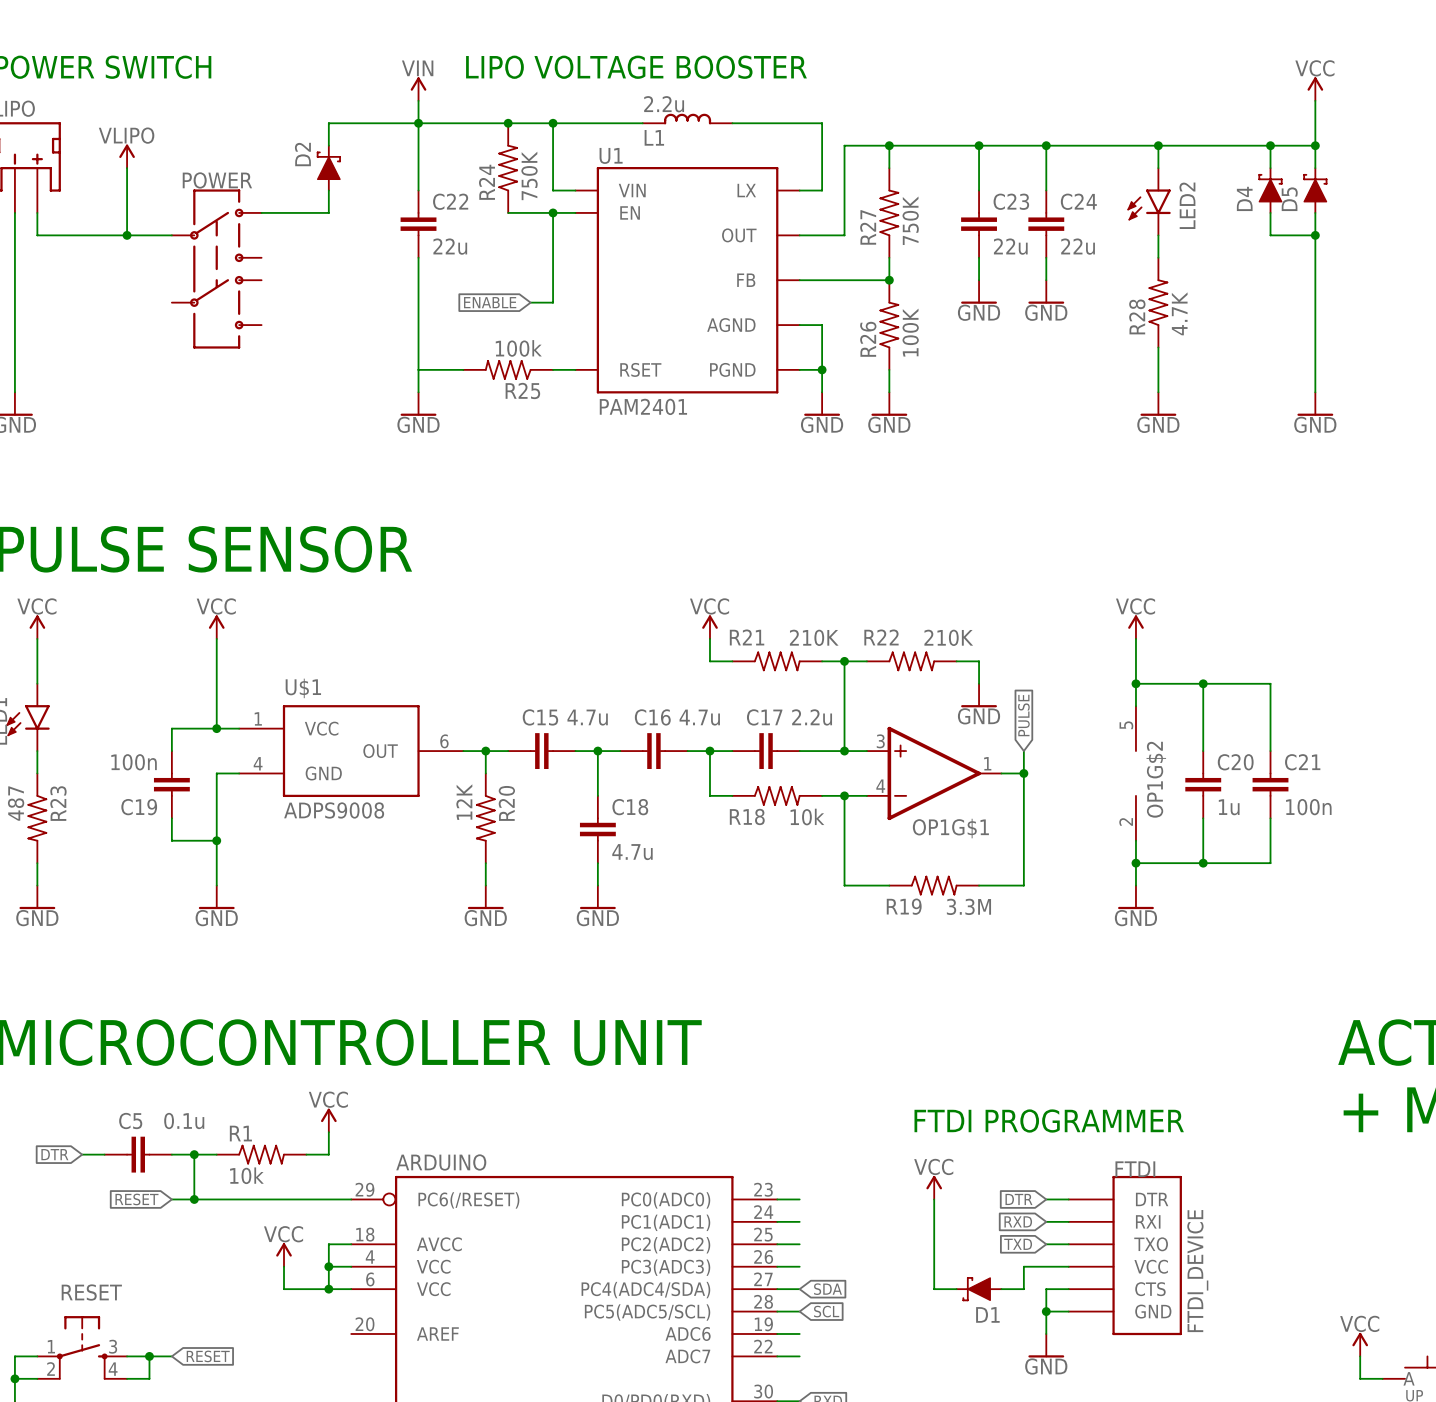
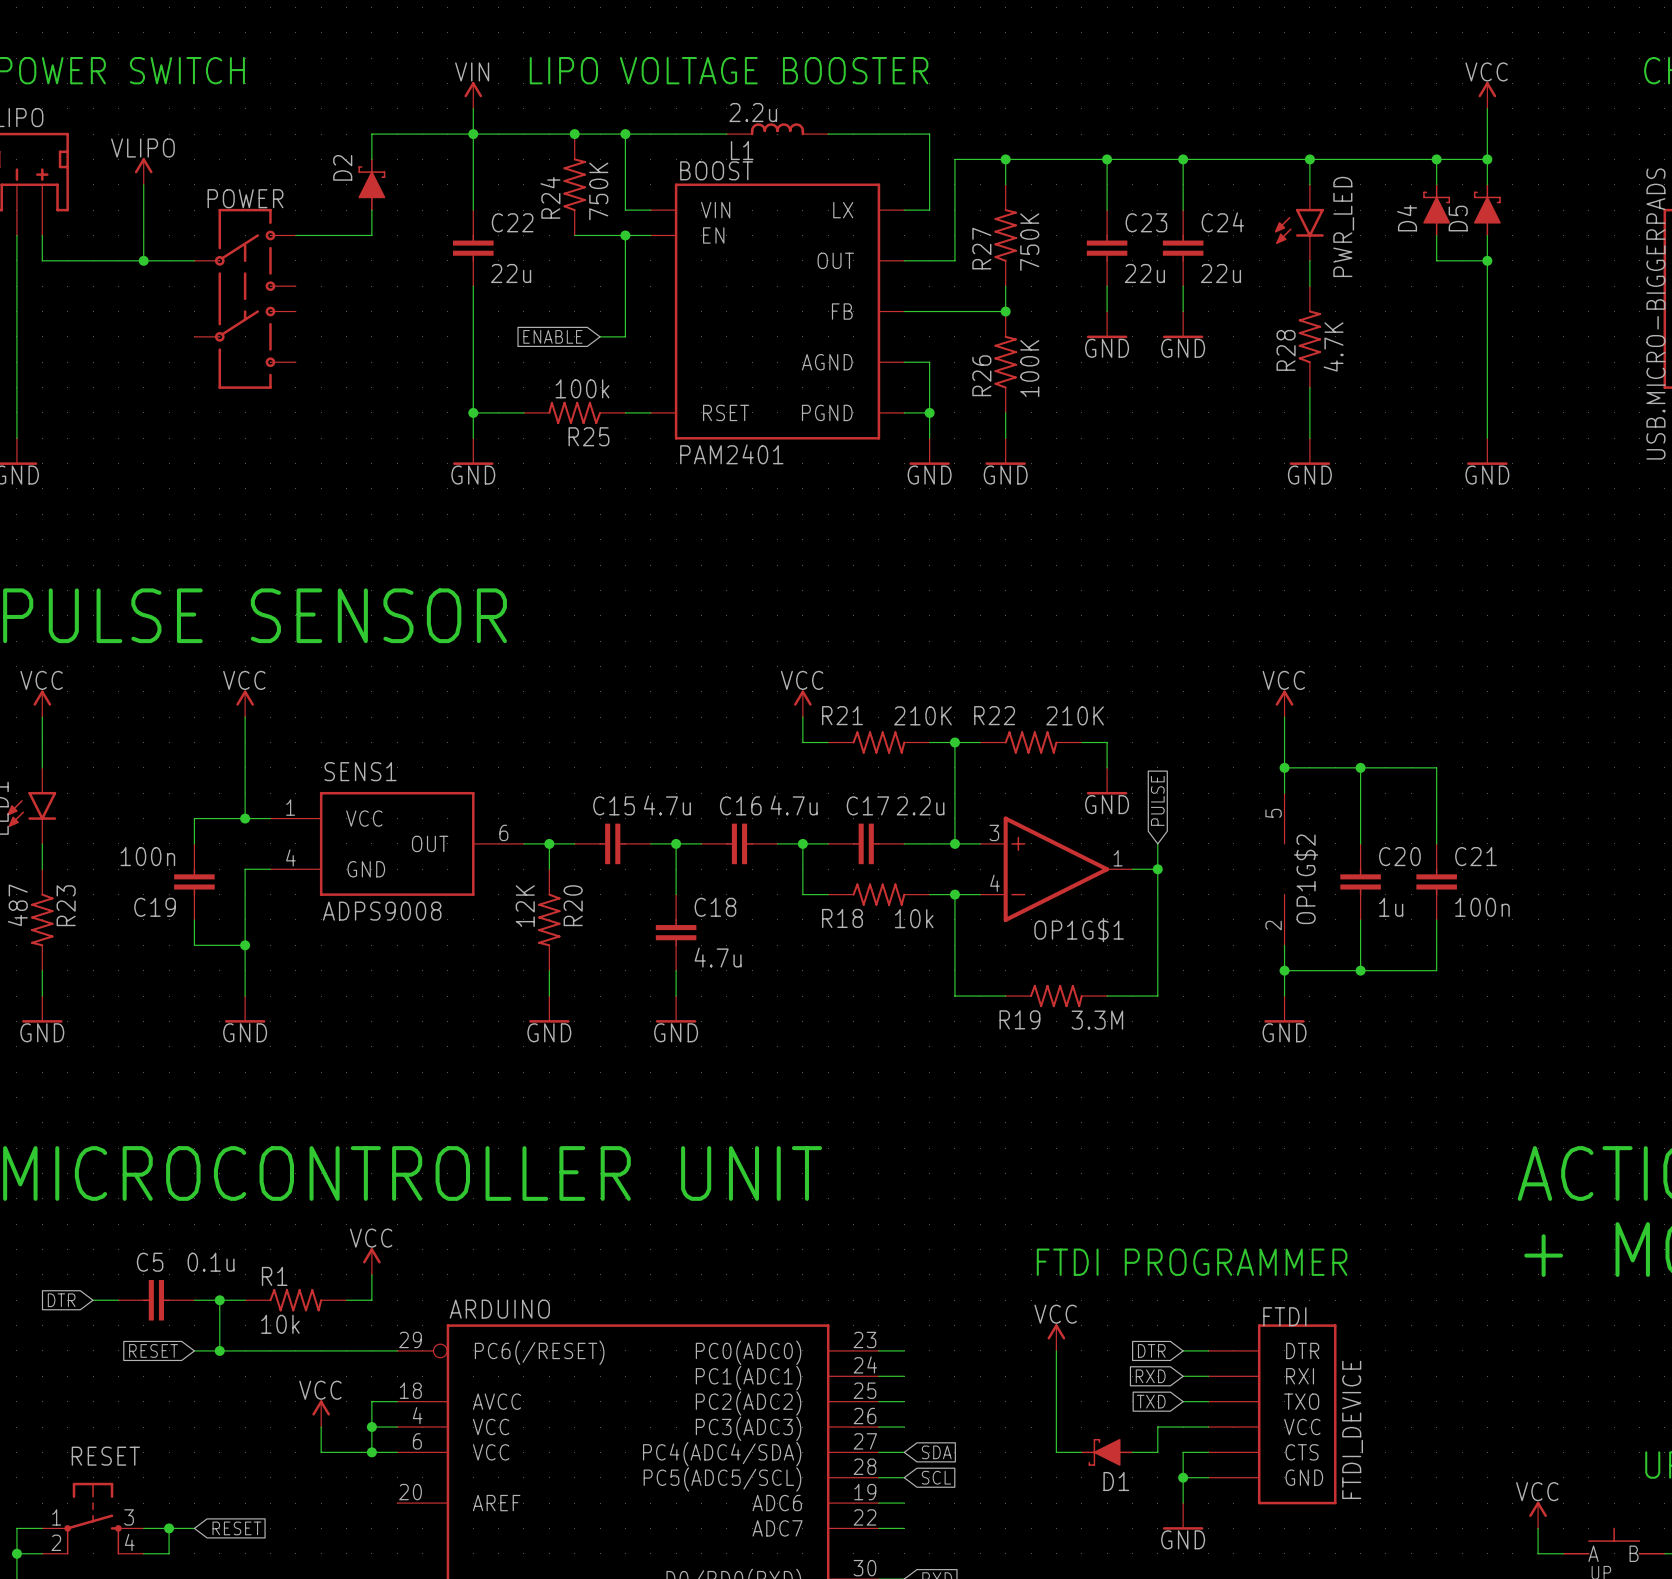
U1 name: U1 (611, 155) -> BOOST (716, 170)
LED2 name: LED2 (1187, 205) -> PWR_LED (1343, 226)
junction: none -> (473, 412)
U$1 name: U$1 (303, 688) -> SENS1 (360, 771)

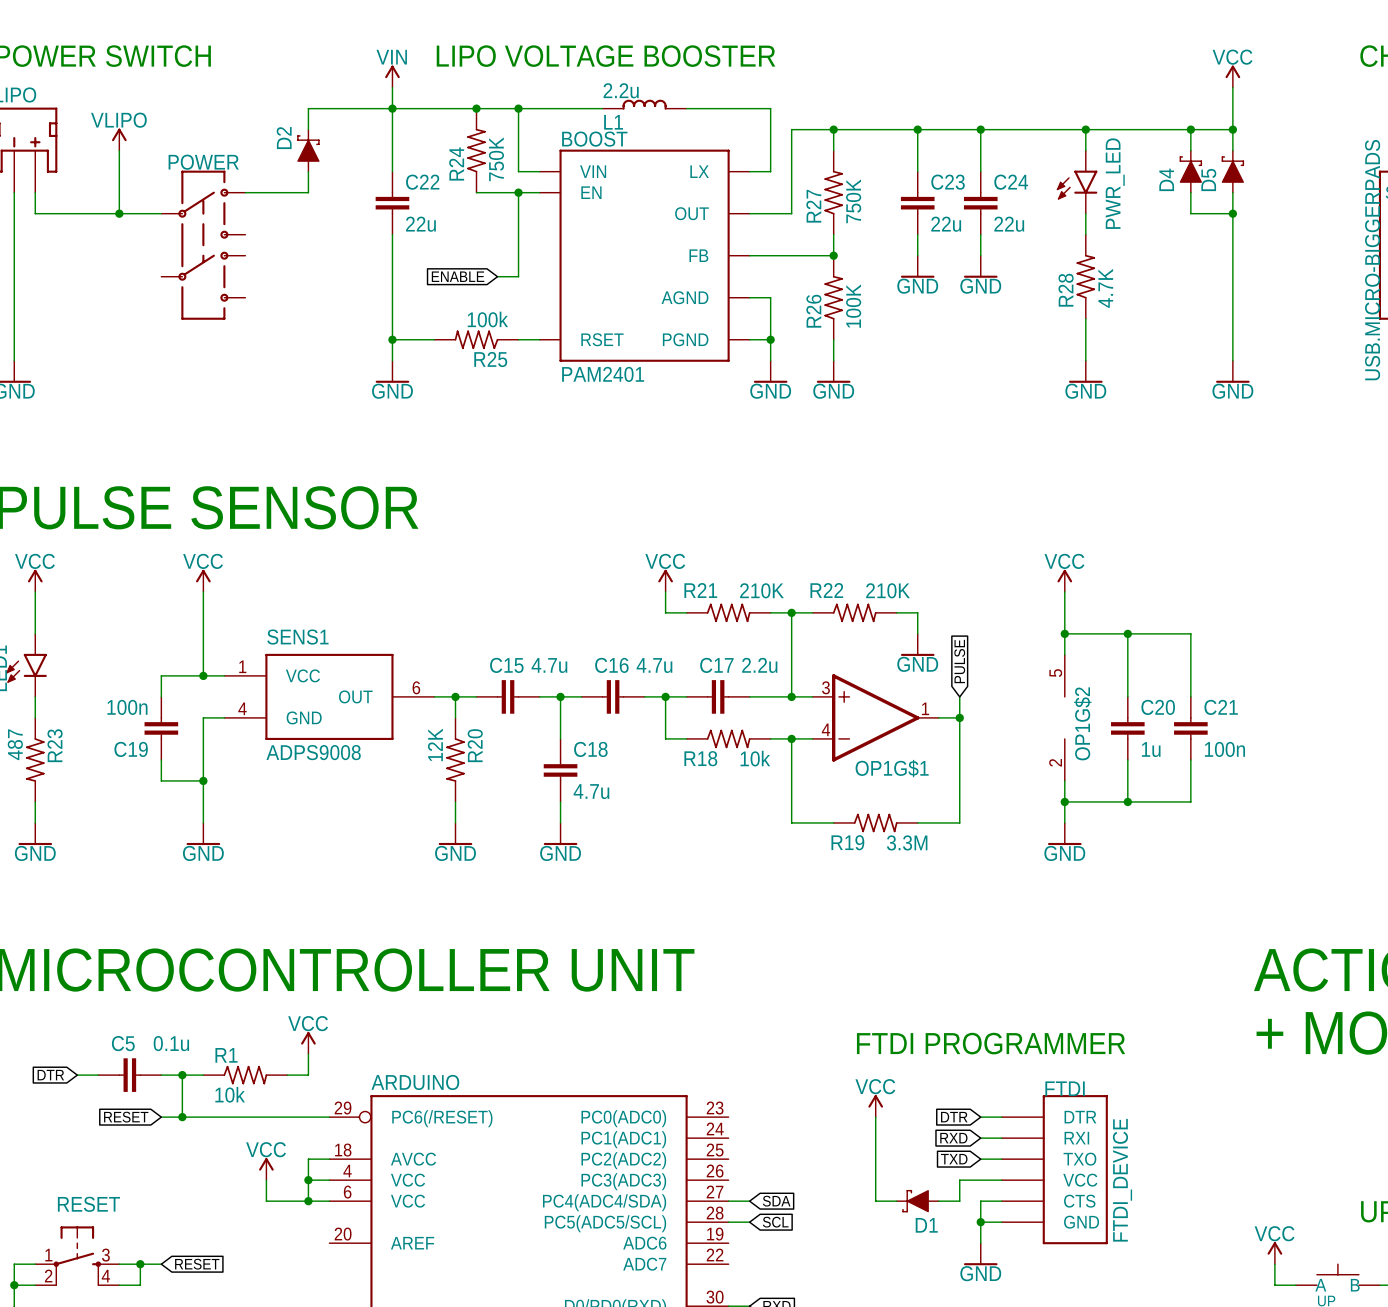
wire: (878, 1350) (904, 1350) -> none
wire: (878, 1376) (904, 1376) -> none
wire: (878, 1401) (904, 1401) -> none
wire: (878, 1427) (904, 1427) -> none
wire: (878, 1503) (904, 1503) -> none
wire: (878, 1528) (904, 1528) -> none

